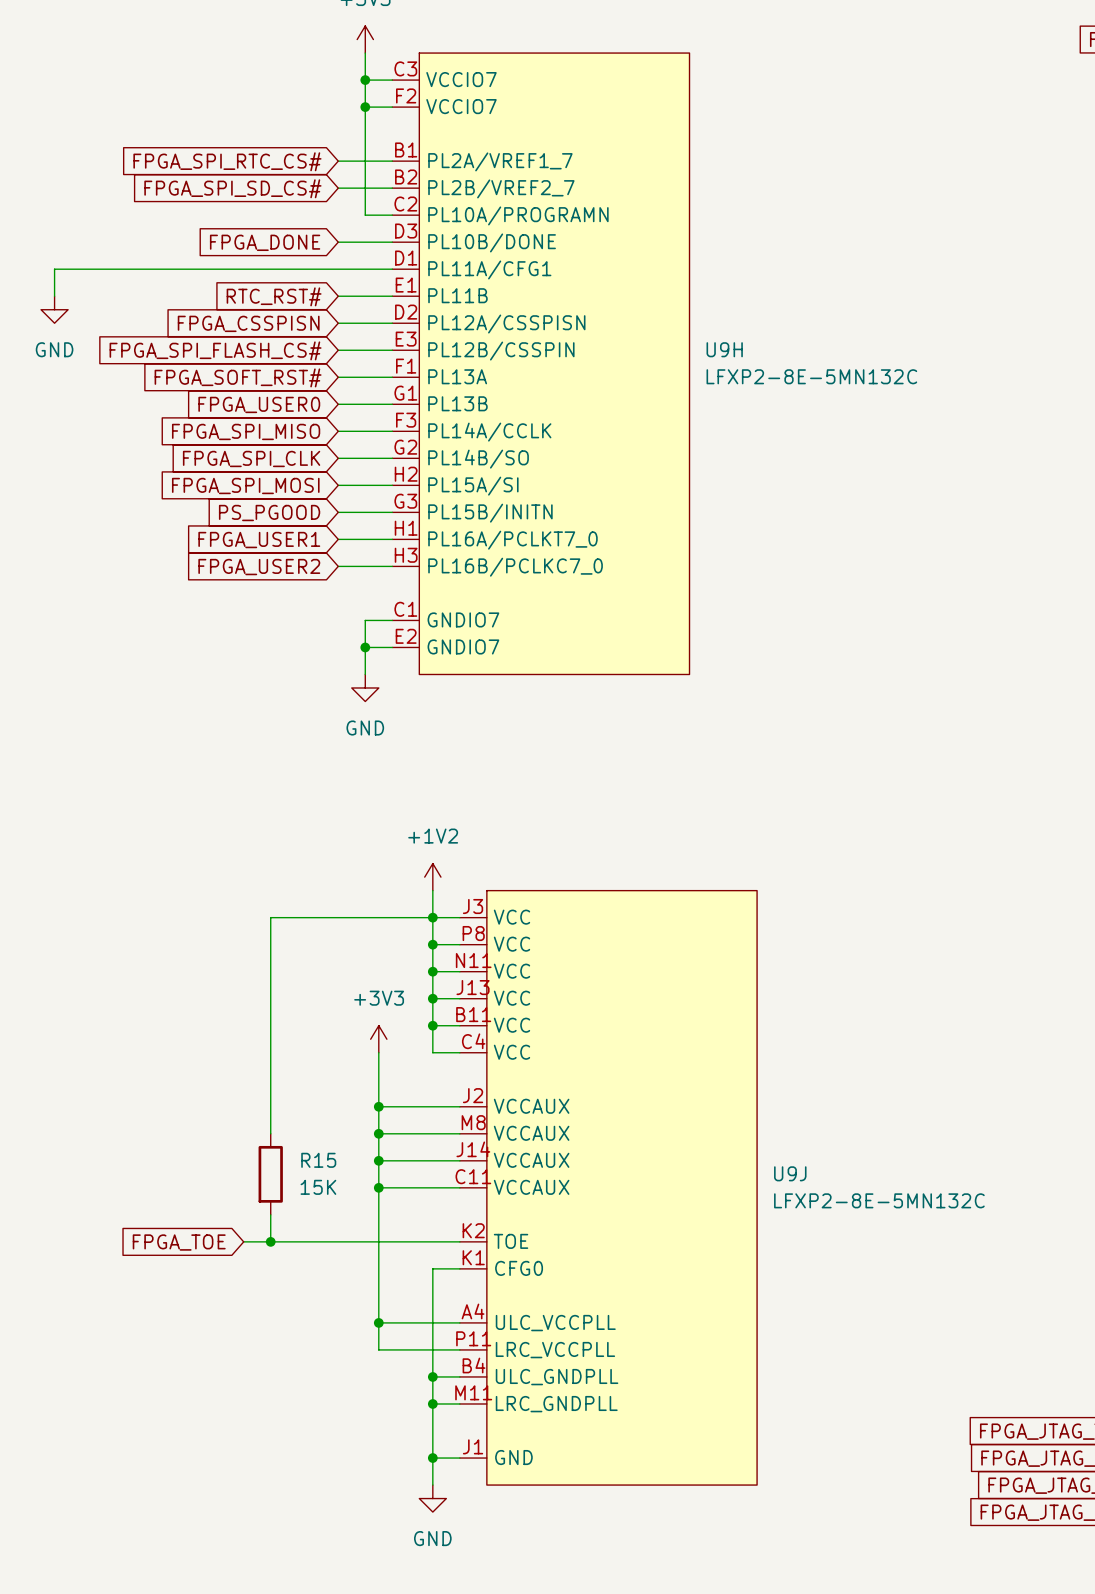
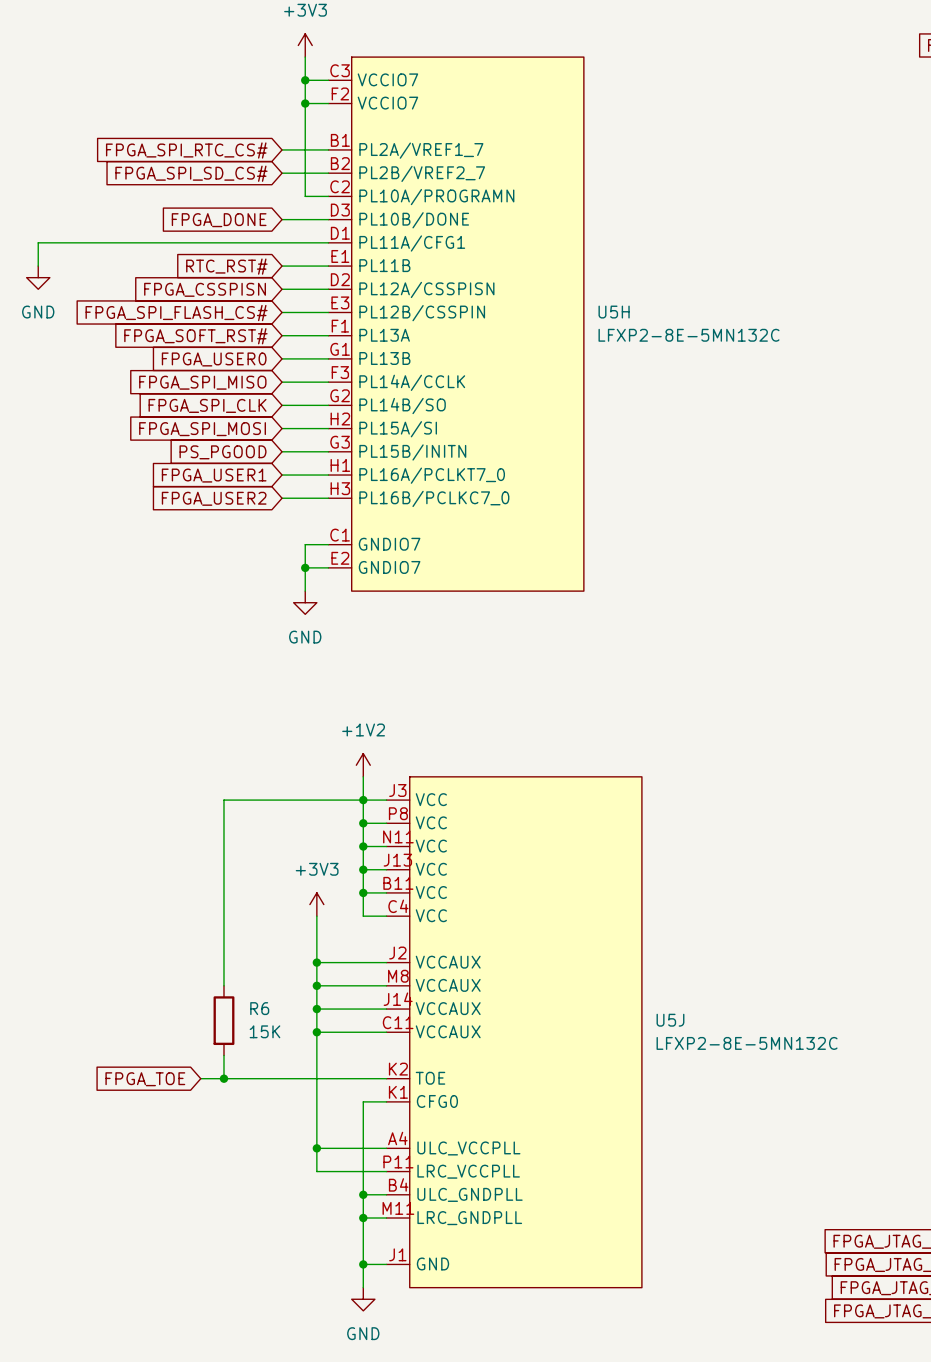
U9H name: U9H (724, 349) -> U5H (614, 312)
R15 name: R15 (318, 1160) -> R6 (259, 1008)
U9J name: U9J (790, 1173) -> U5J (670, 1020)

